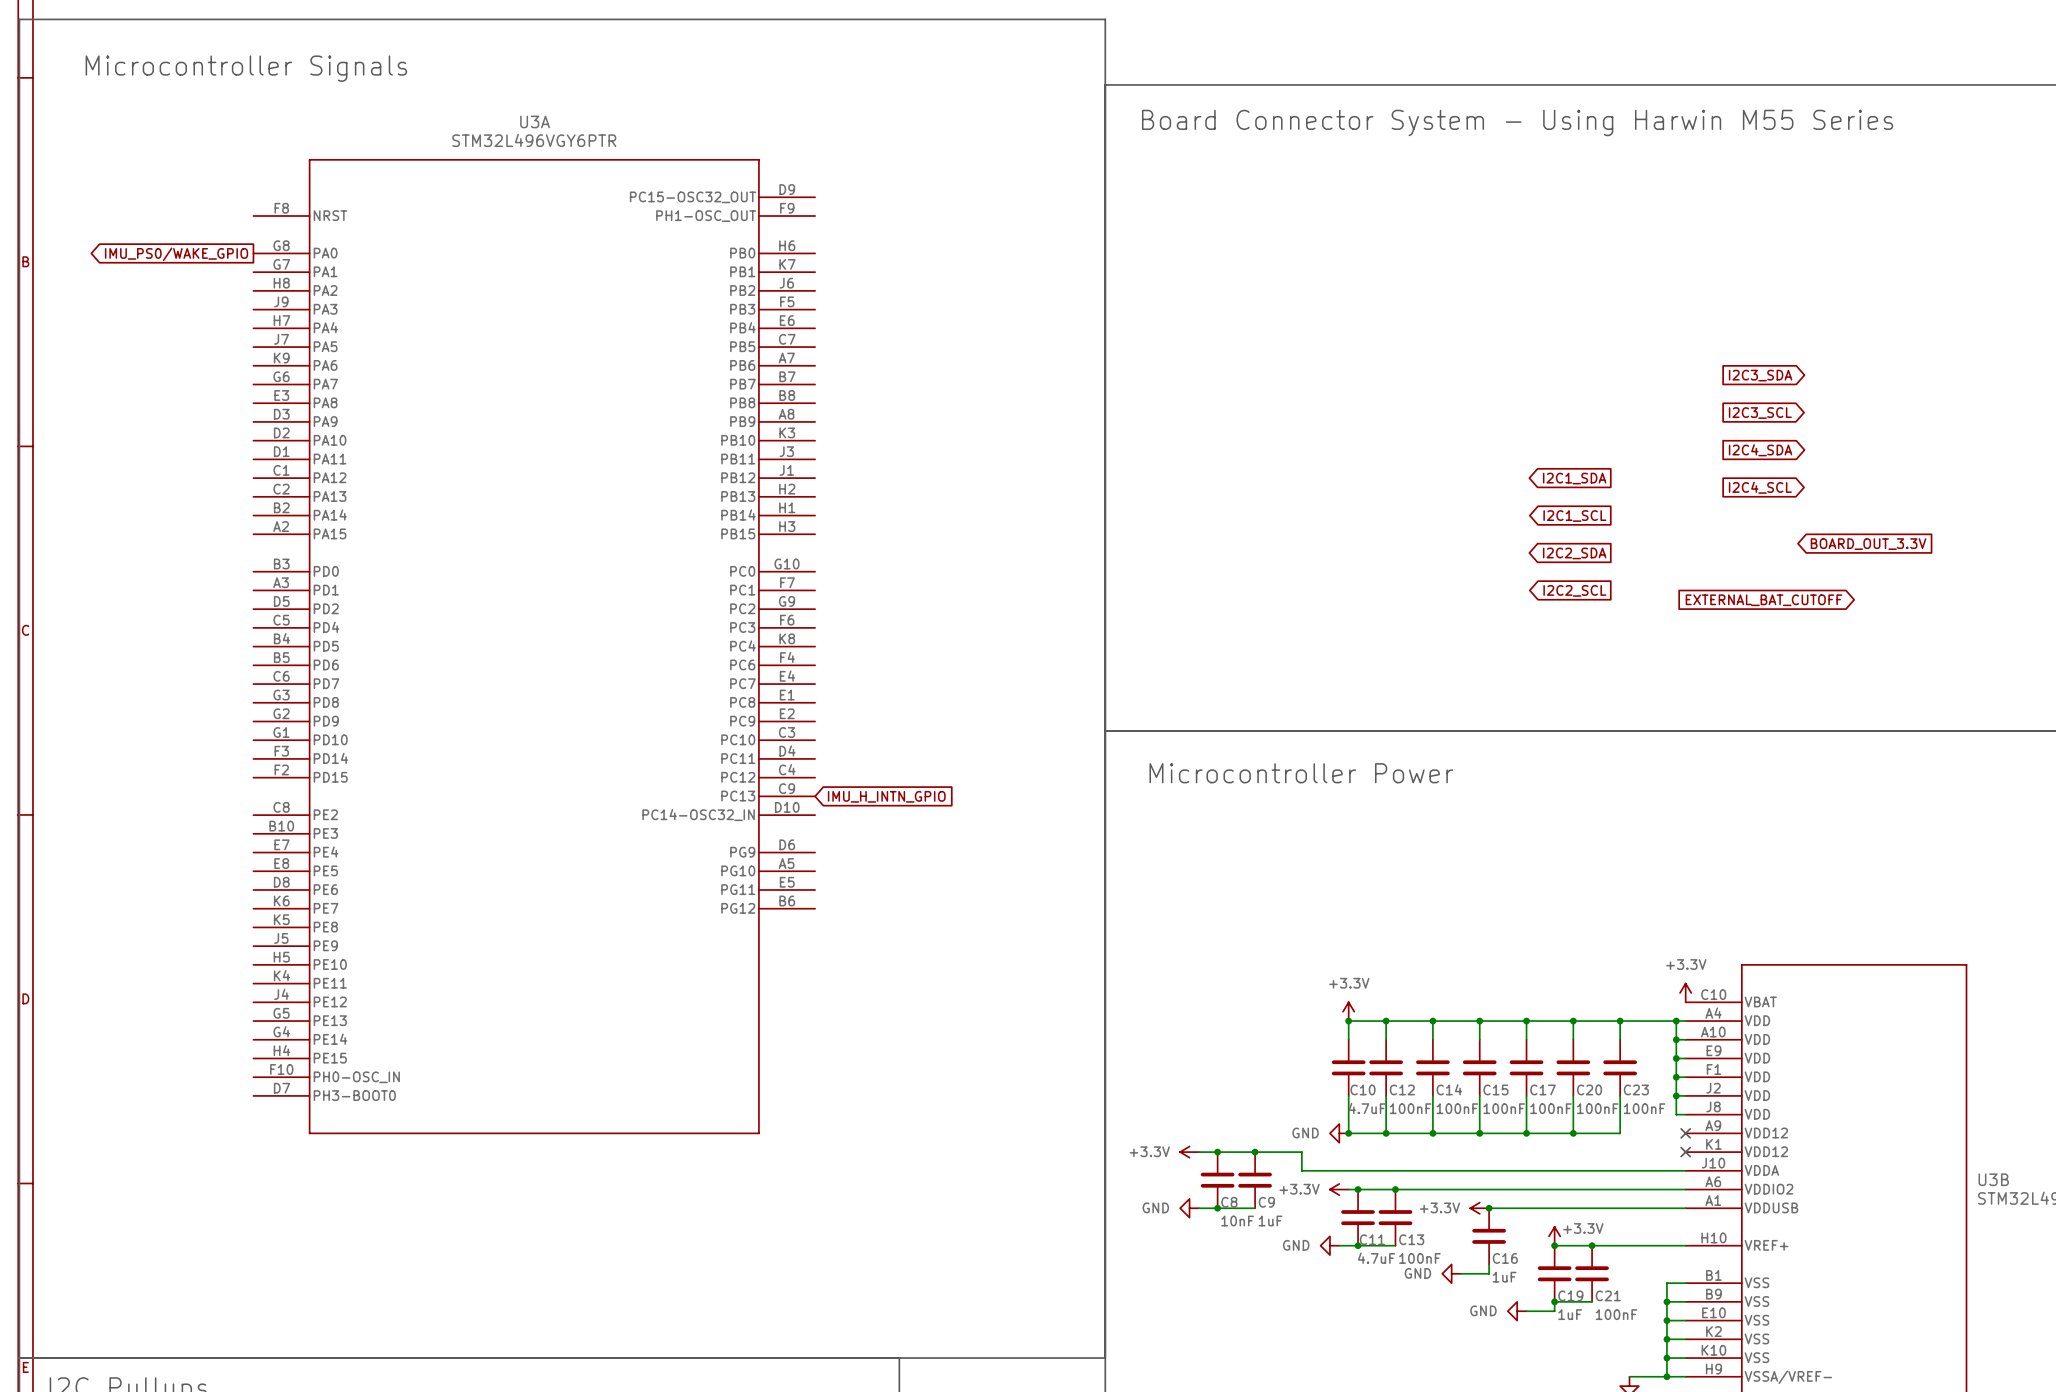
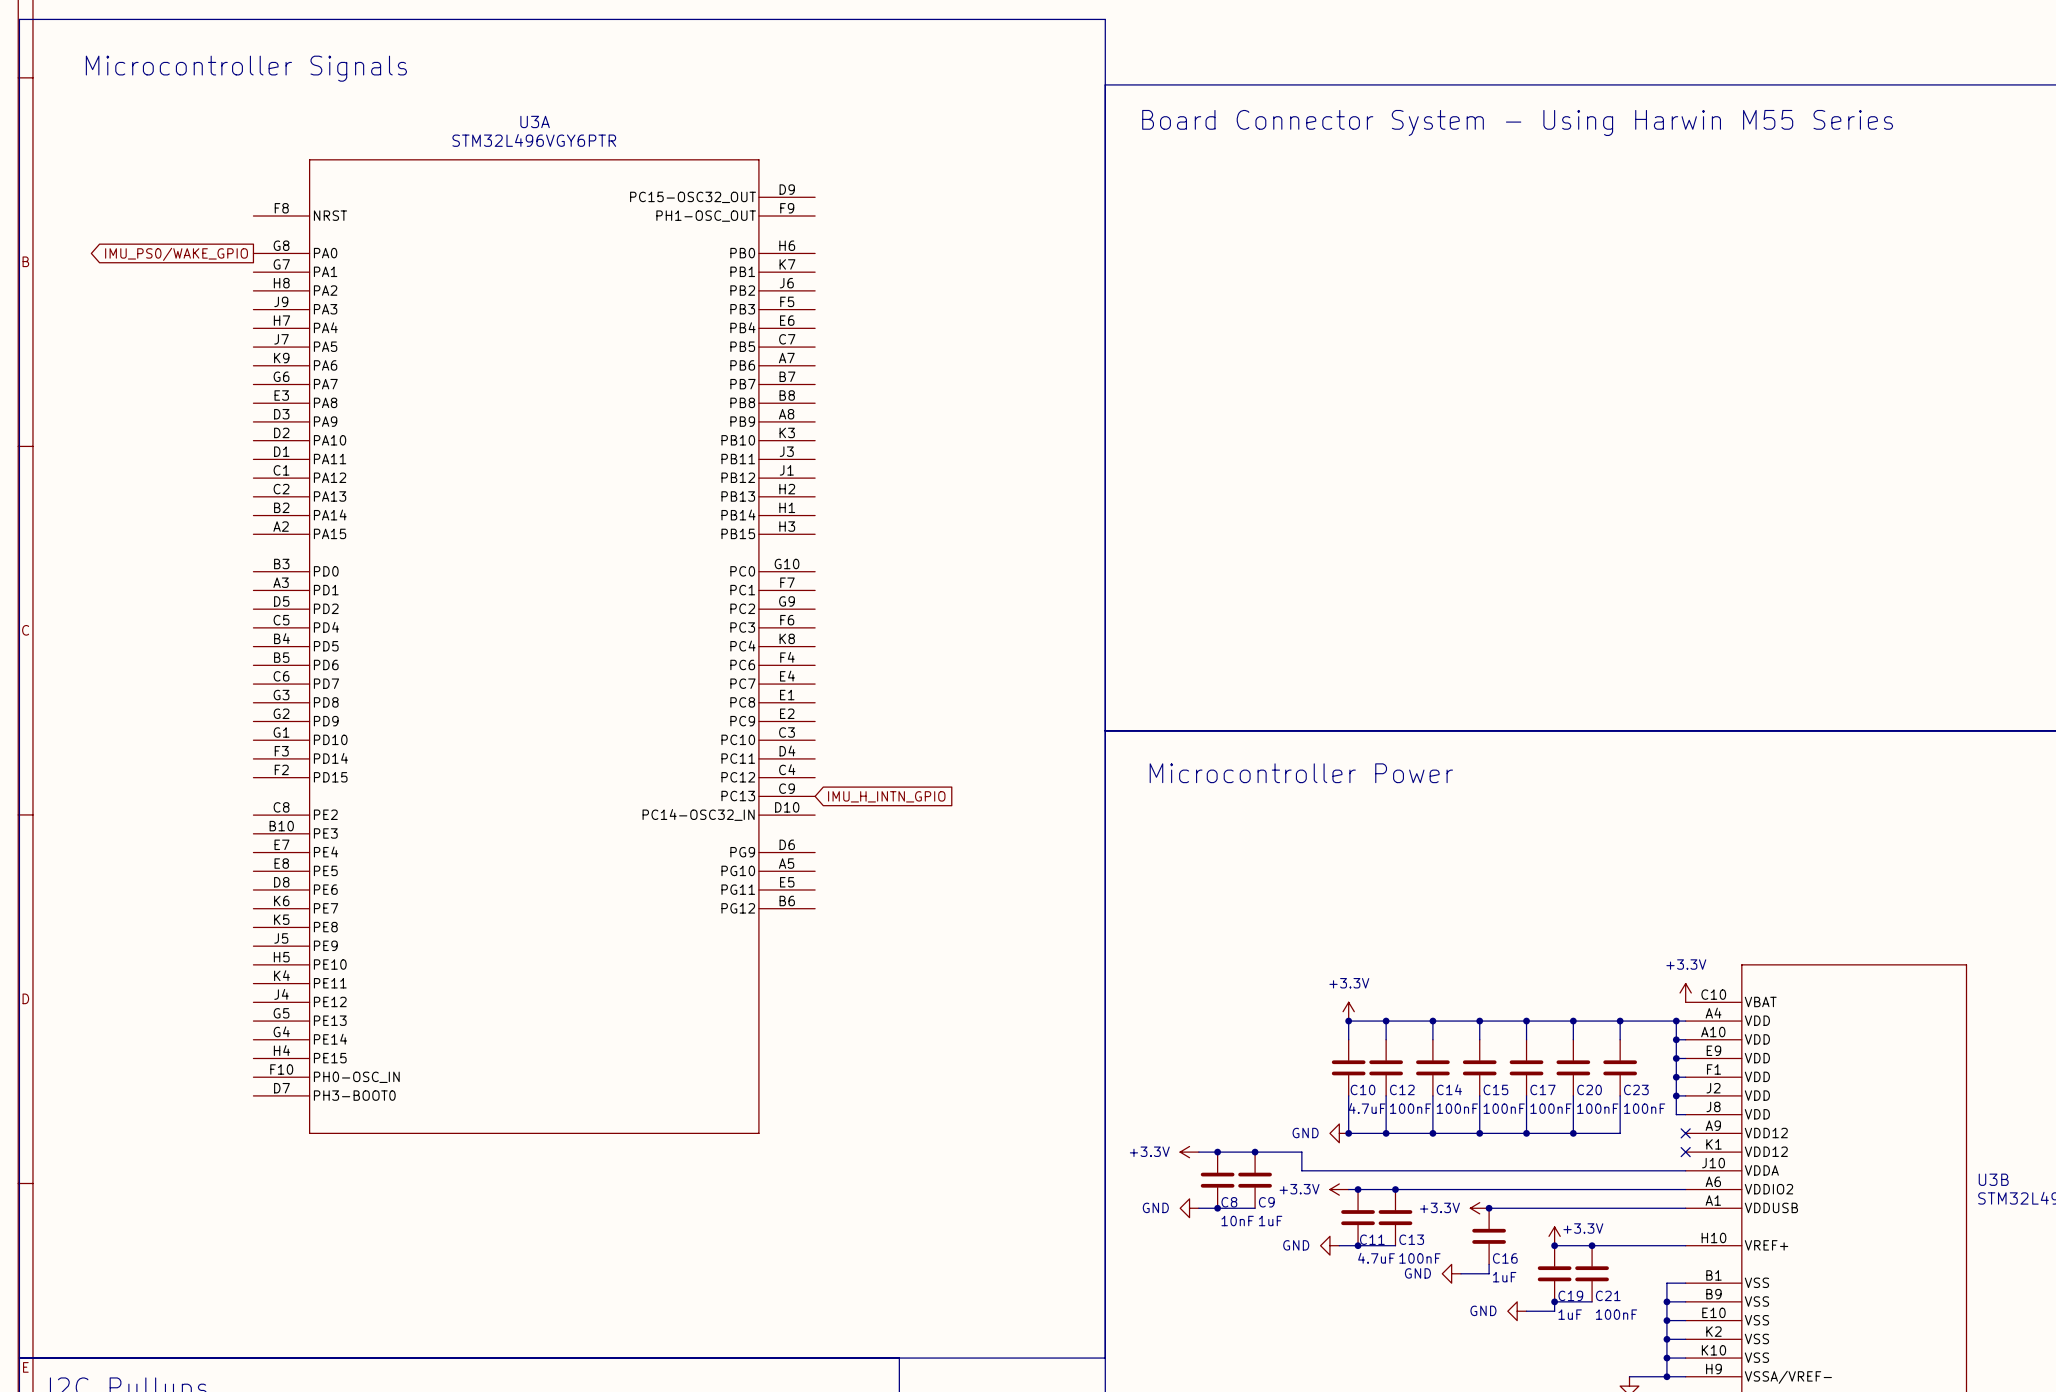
global label: I2C3_SDA (1760, 375) -> none
global label: I2C3_SCL (1760, 413) -> none
global label: I2C4_SDA (1760, 450) -> none
global label: I2C1_SDA (1574, 478) -> none
global label: I2C4_SCL (1760, 487) -> none
global label: I2C1_SCL (1574, 515) -> none
global label: BOARD_OUT_3.3V (1868, 544) -> none
global label: I2C2_SDA (1574, 553) -> none
global label: I2C2_SCL (1574, 590) -> none
global label: EXTERNAL_BAT_CUTOFF (1764, 600) -> none

